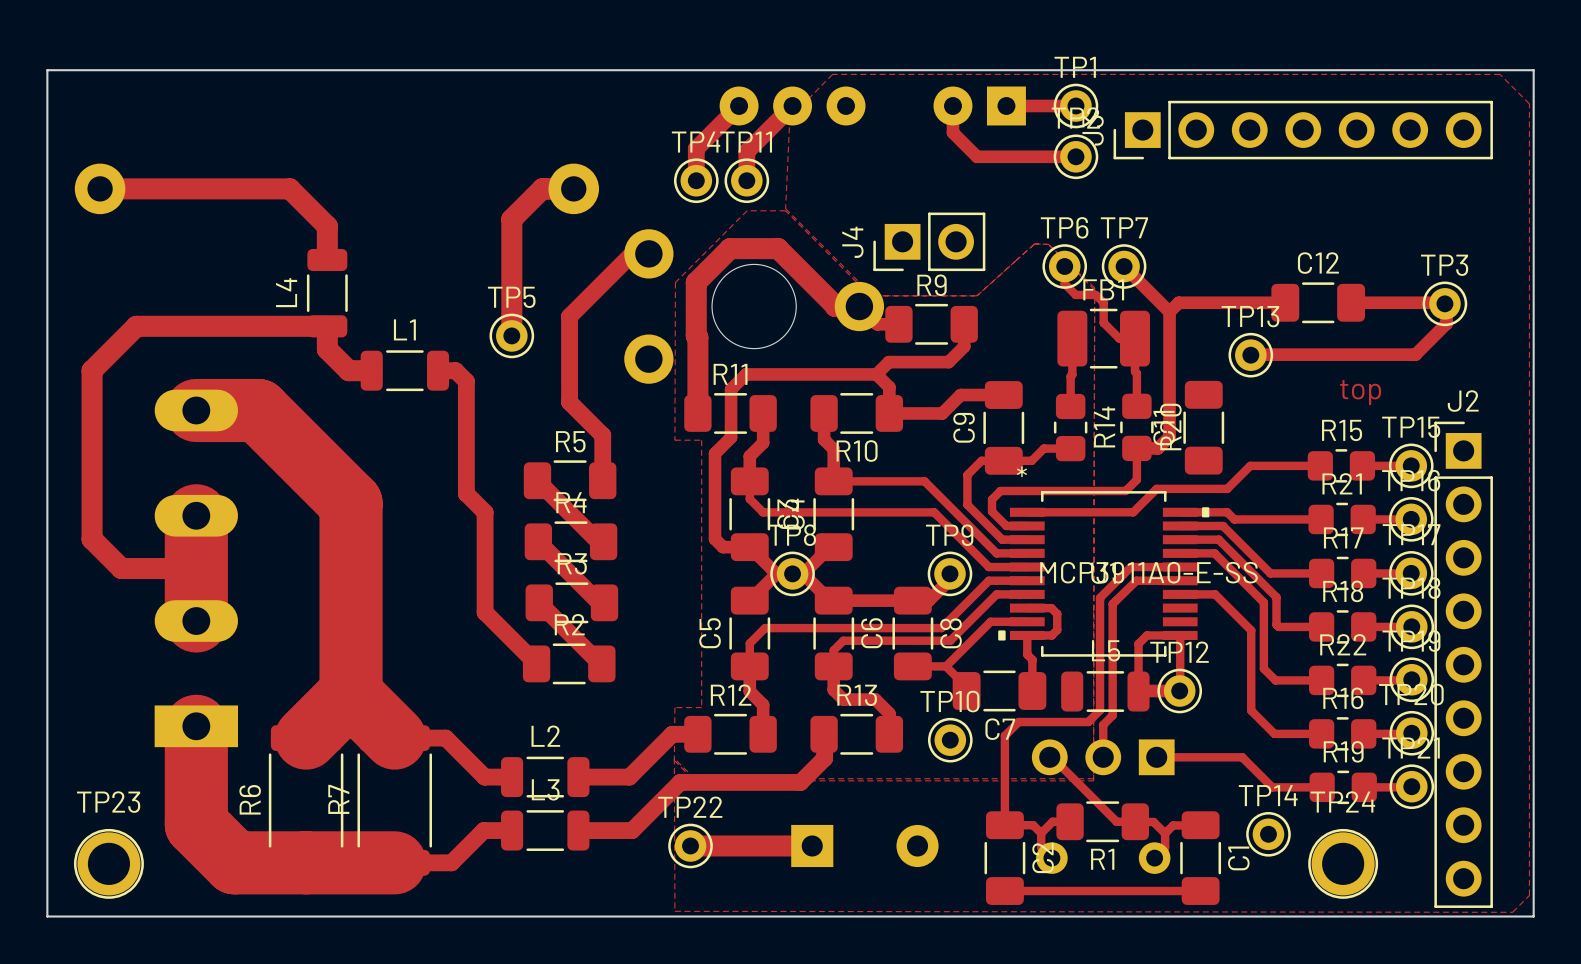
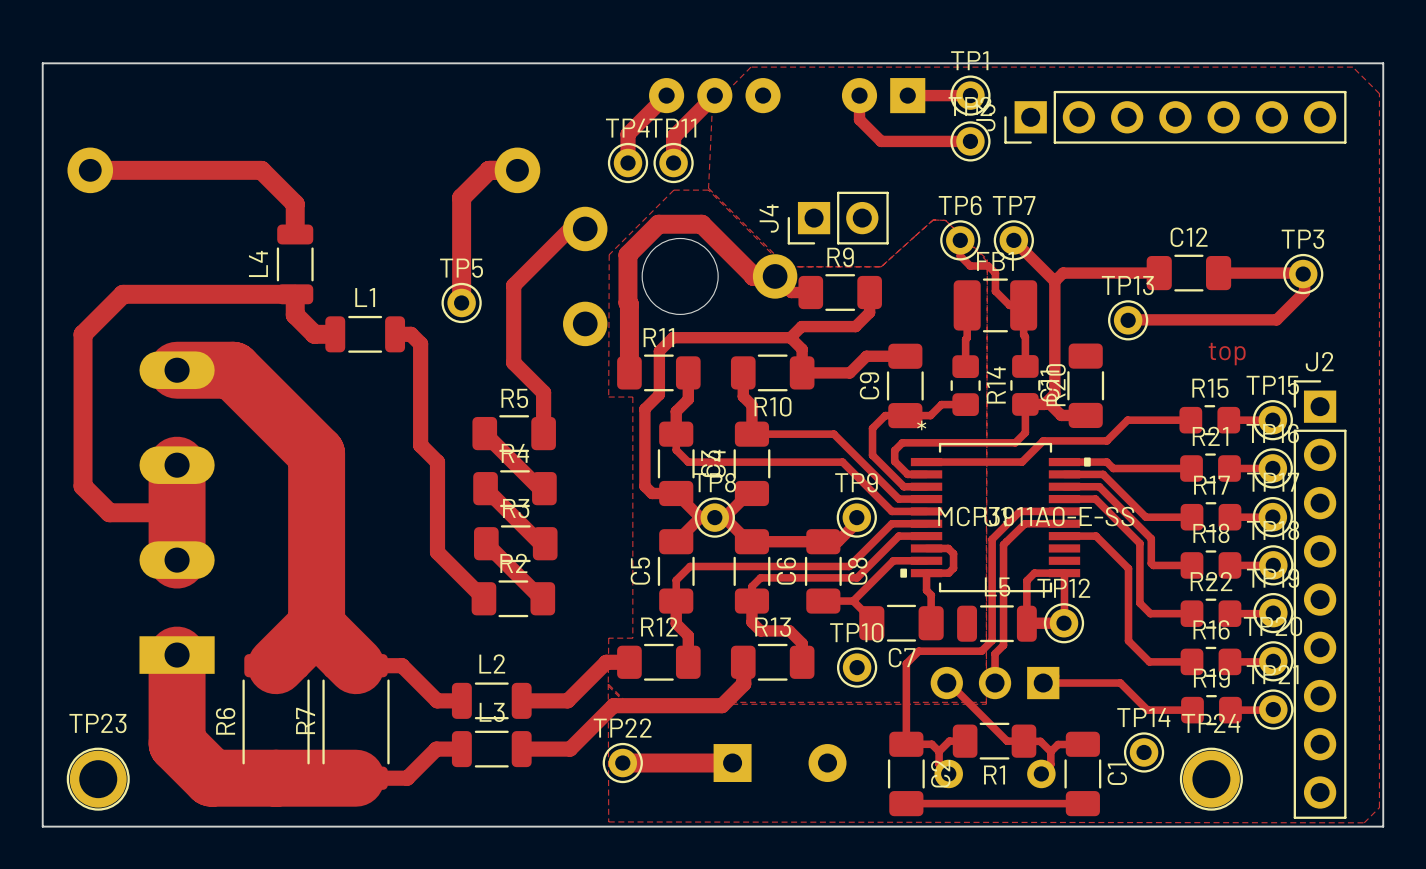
track: none -> (1050, 404) (1061, 415) (1085, 415)

